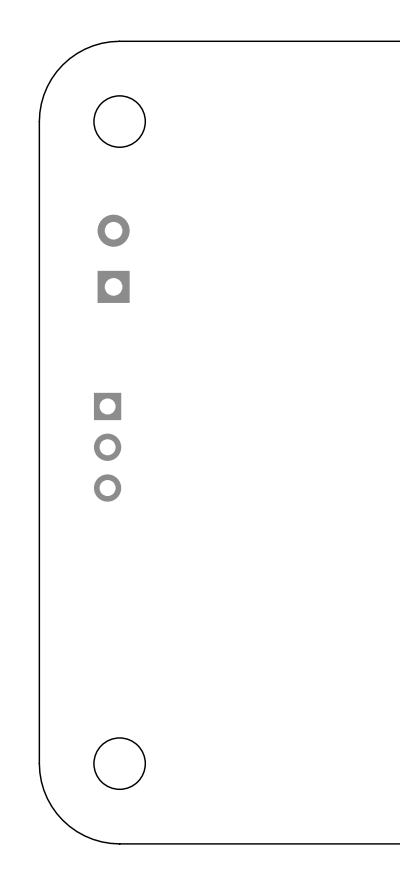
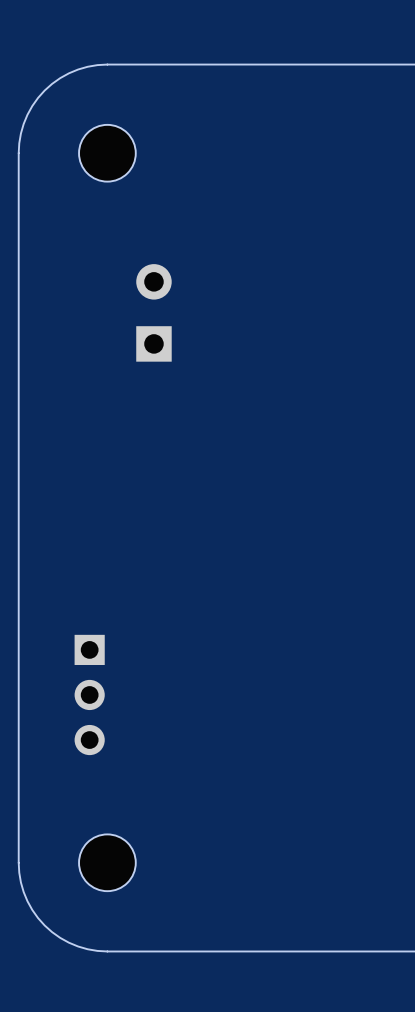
part position: (113, 258) -> (153, 312)
part position: (107, 447) -> (89, 694)

